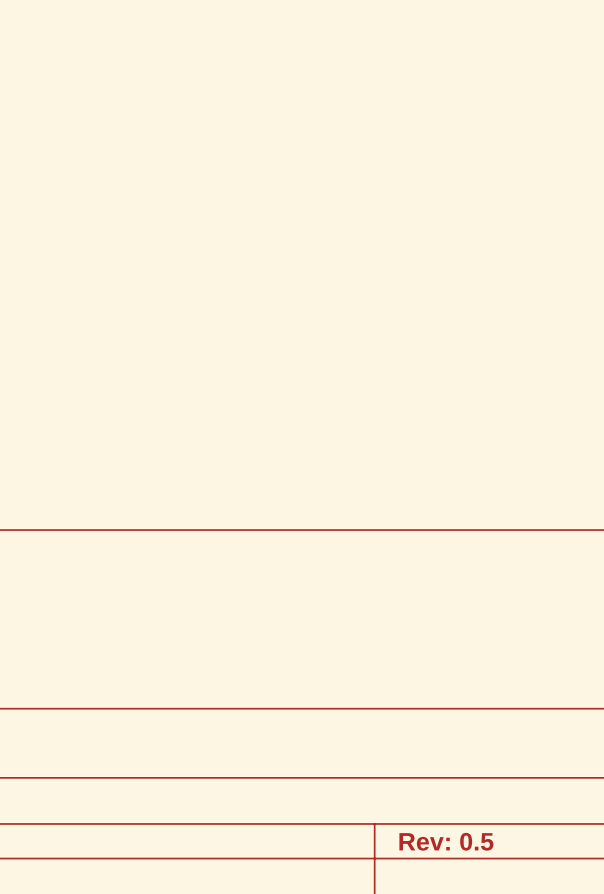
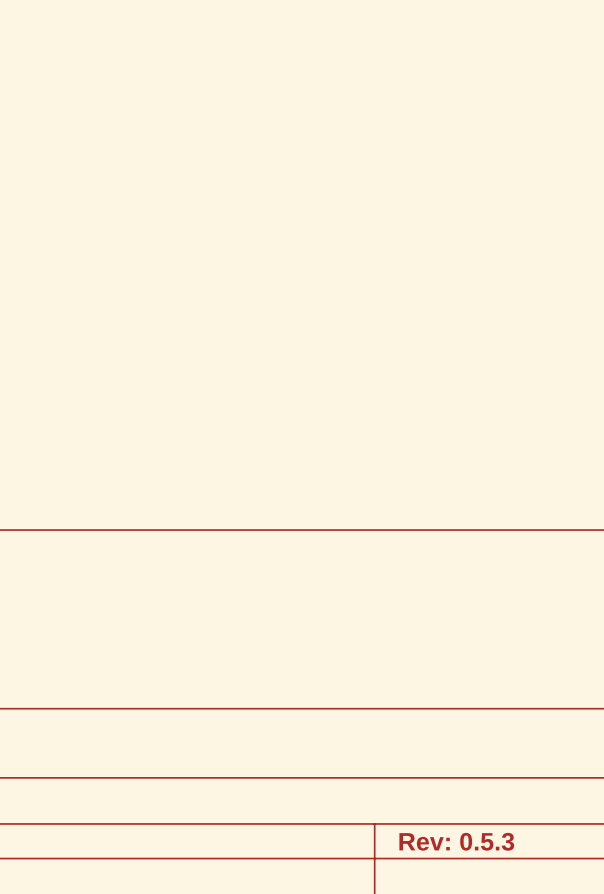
title block: Rev: 0.5 (446, 841) -> Rev: 0.5.3 (456, 841)

